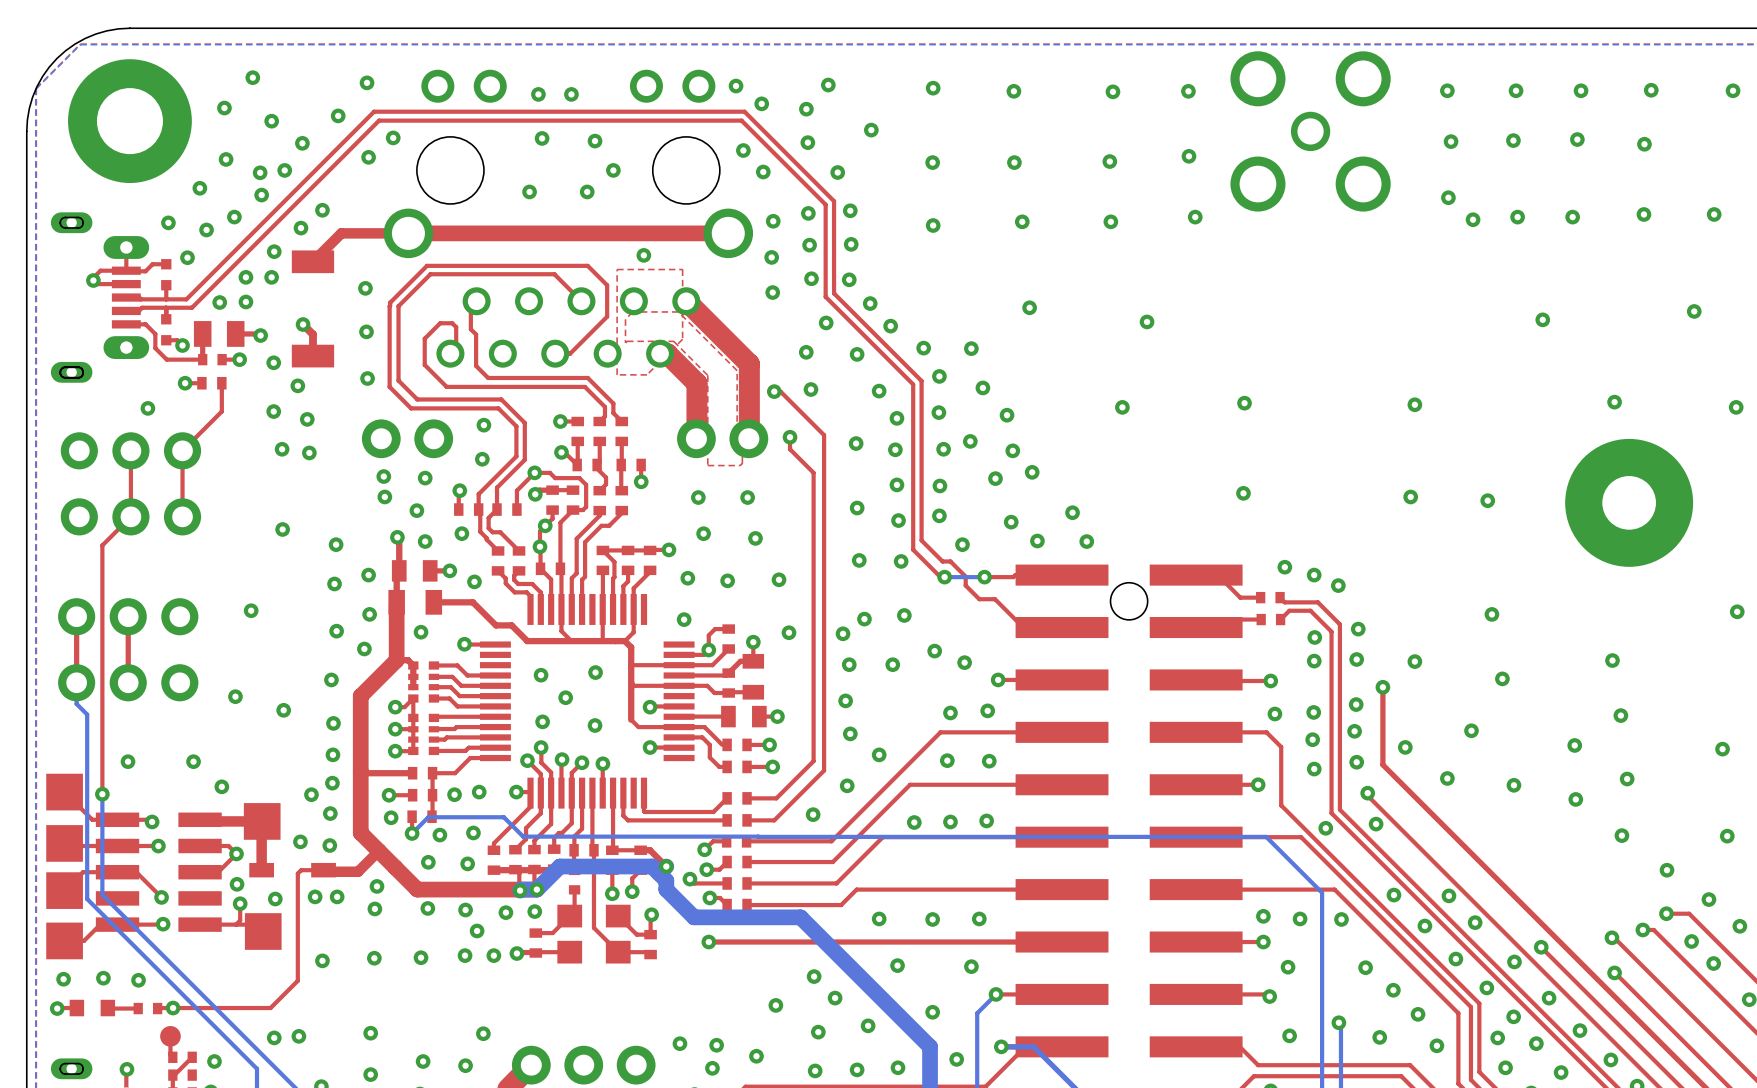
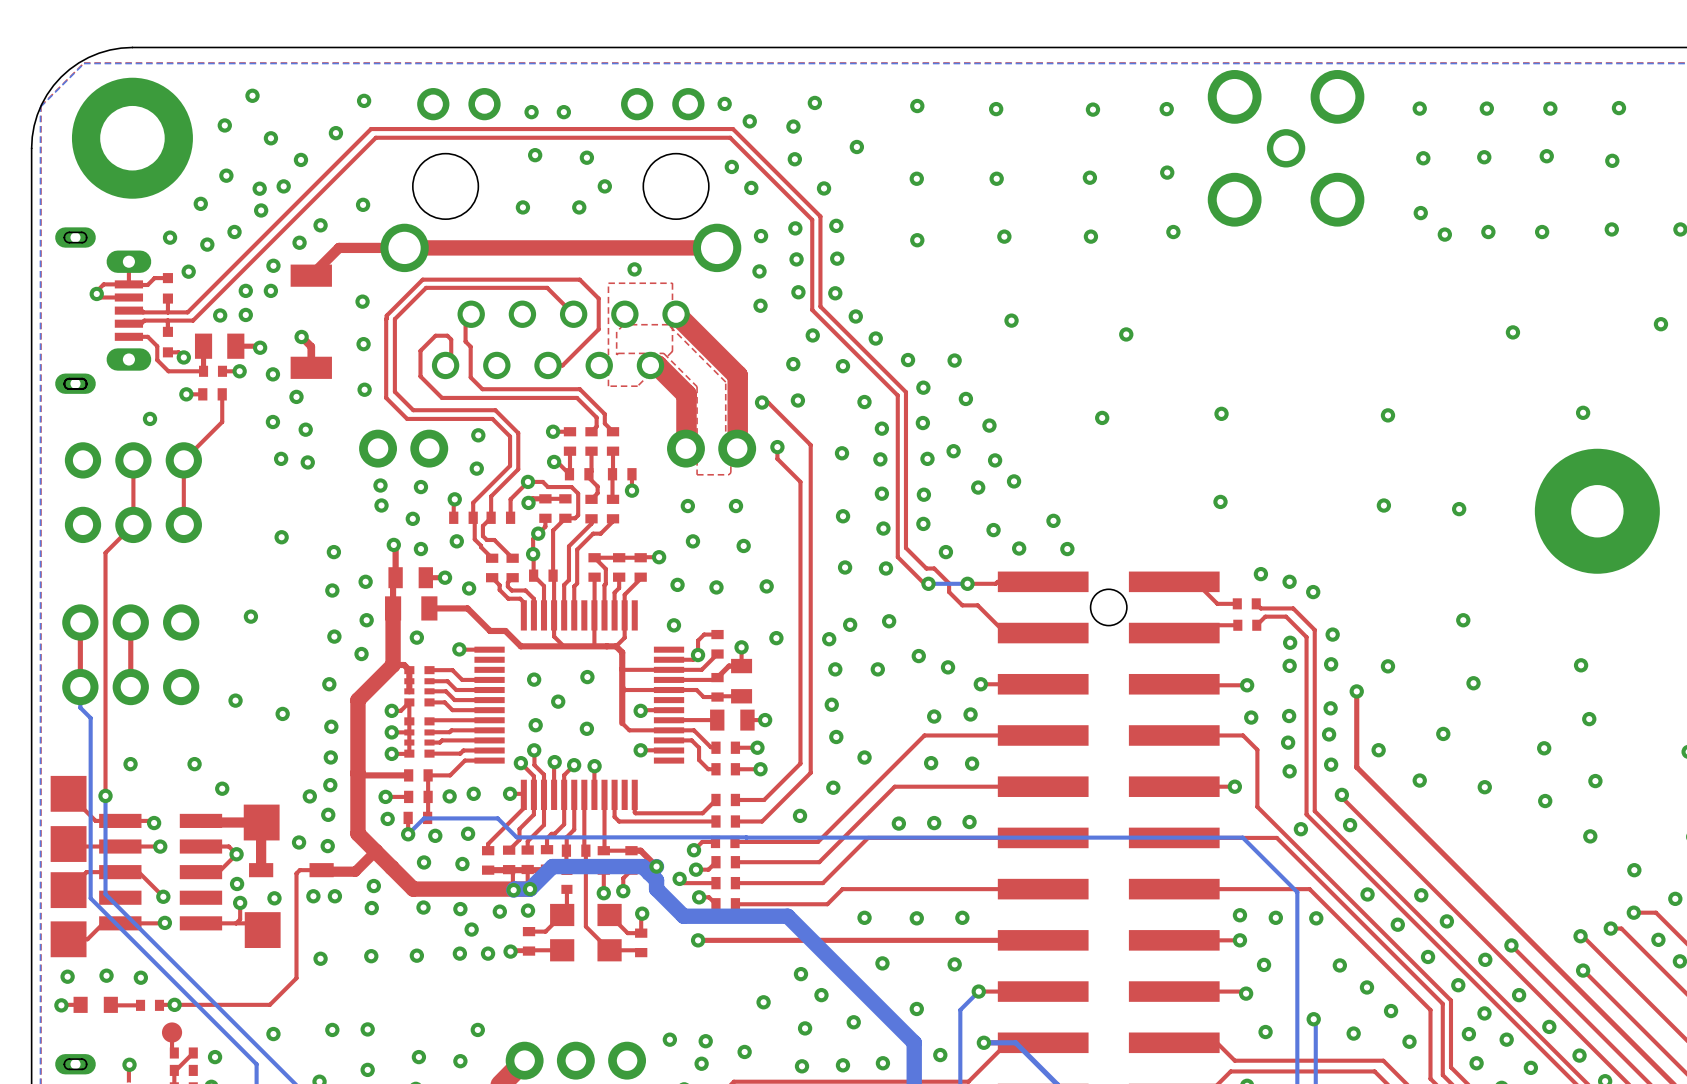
via: (393, 137) -> none
via: (368, 157) -> none
via: none -> (363, 204)
via position: (298, 1036) -> (332, 1029)

